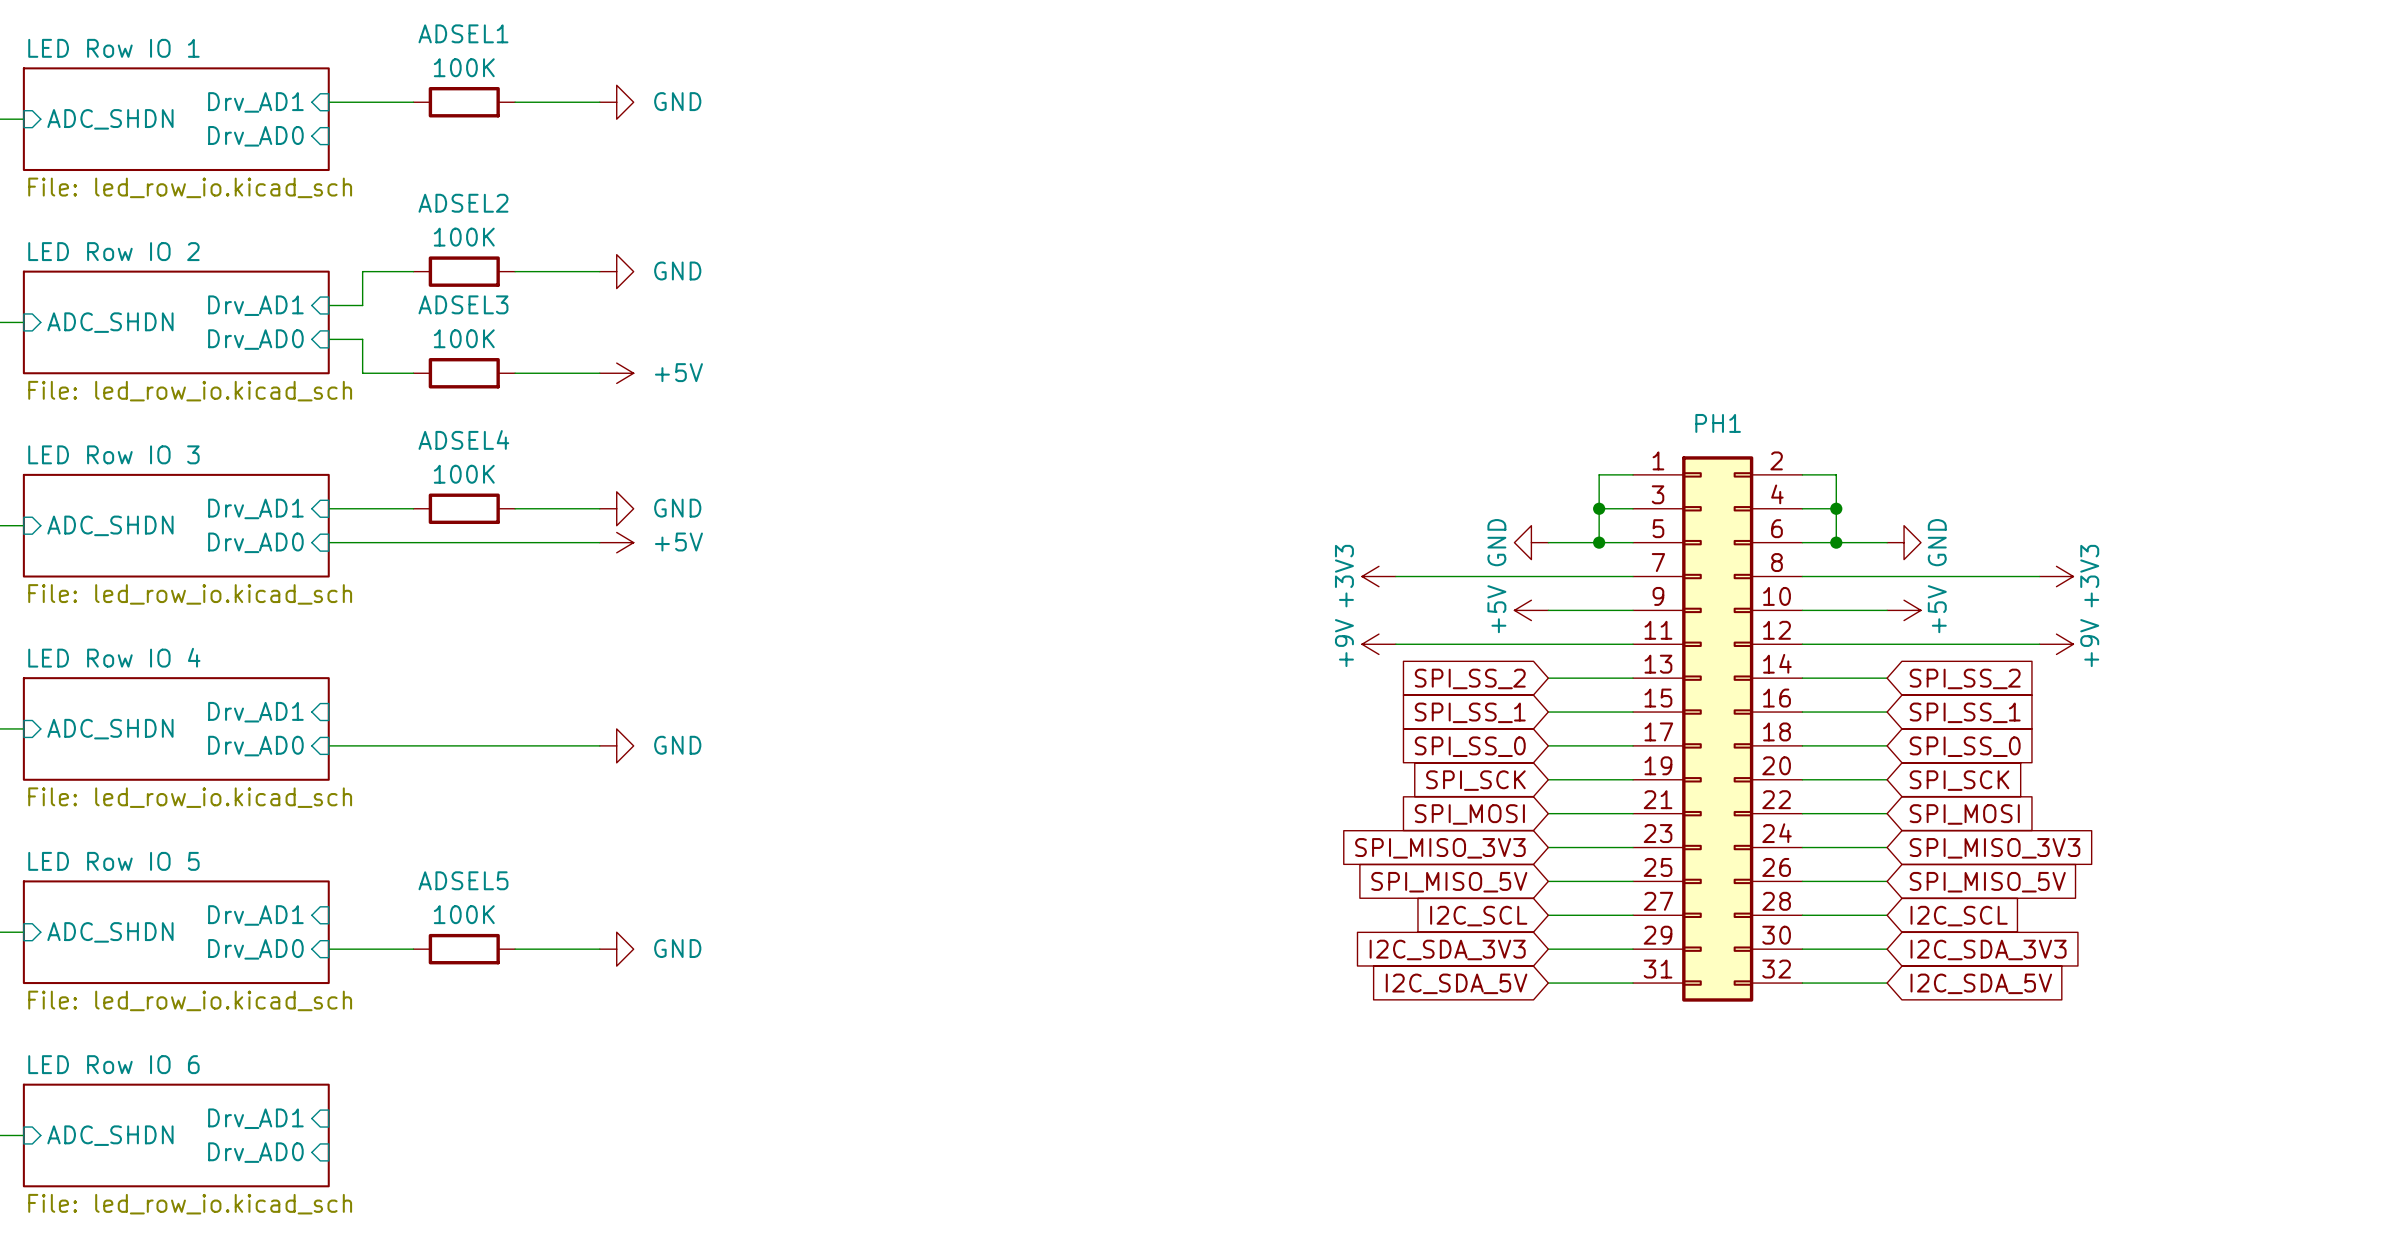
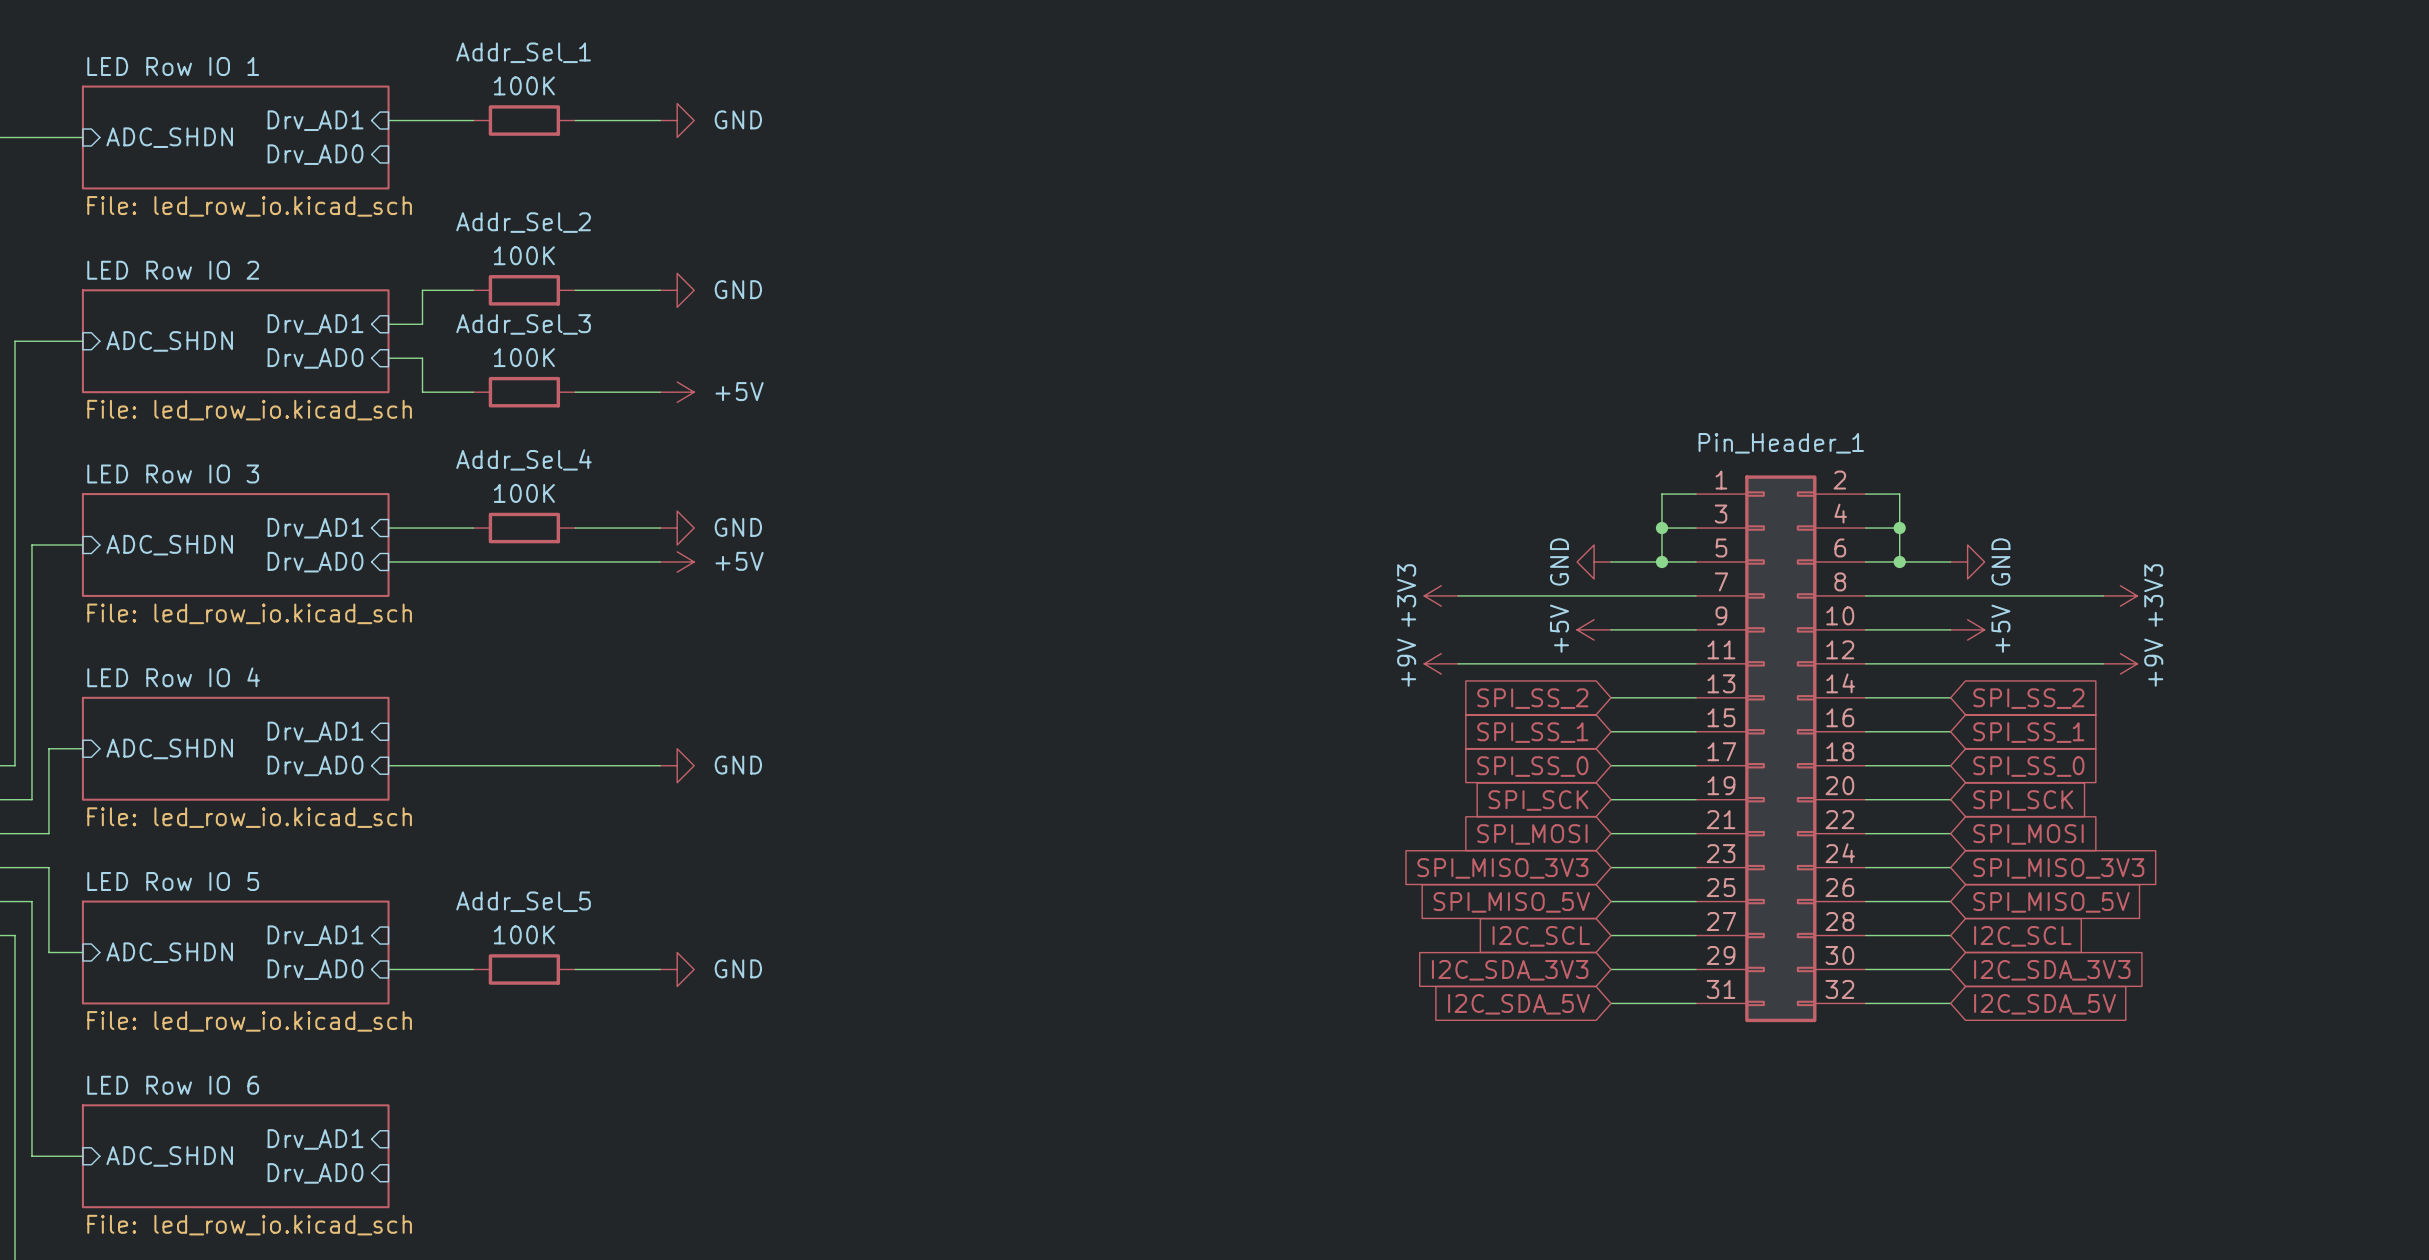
ADSEL1 name: ADSEL1 (463, 33) -> Addr_Sel_1 (523, 52)
ADSEL2 name: ADSEL2 (463, 203) -> Addr_Sel_2 (523, 222)
ADSEL3 name: ADSEL3 (463, 304) -> Addr_Sel_3 (523, 324)
PH1 name: PH1 (1718, 423) -> Pin_Header_1 (1781, 443)
ADSEL4 name: ADSEL4 (463, 439) -> Addr_Sel_4 (523, 459)
ADSEL5 name: ADSEL5 (463, 880) -> Addr_Sel_5 (523, 901)

